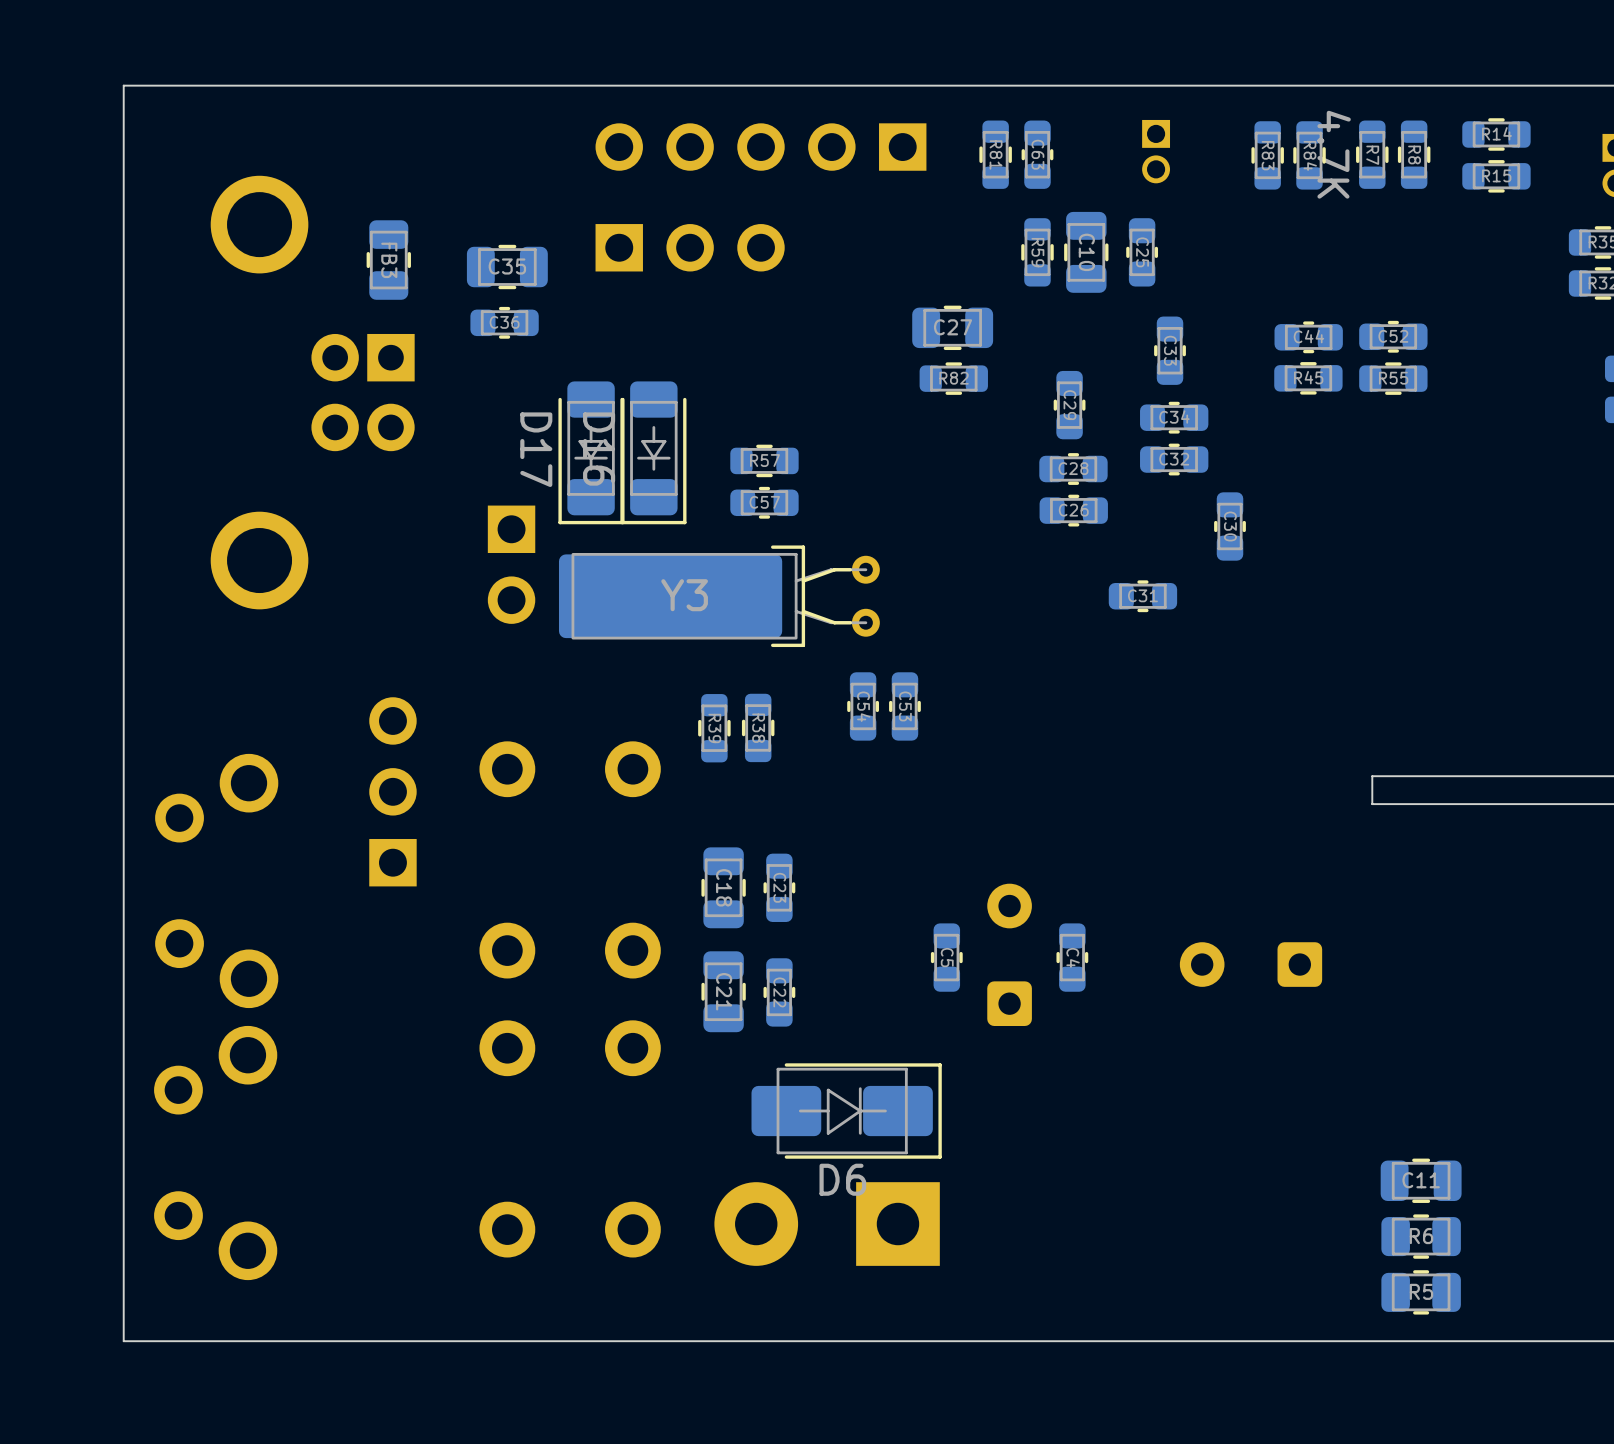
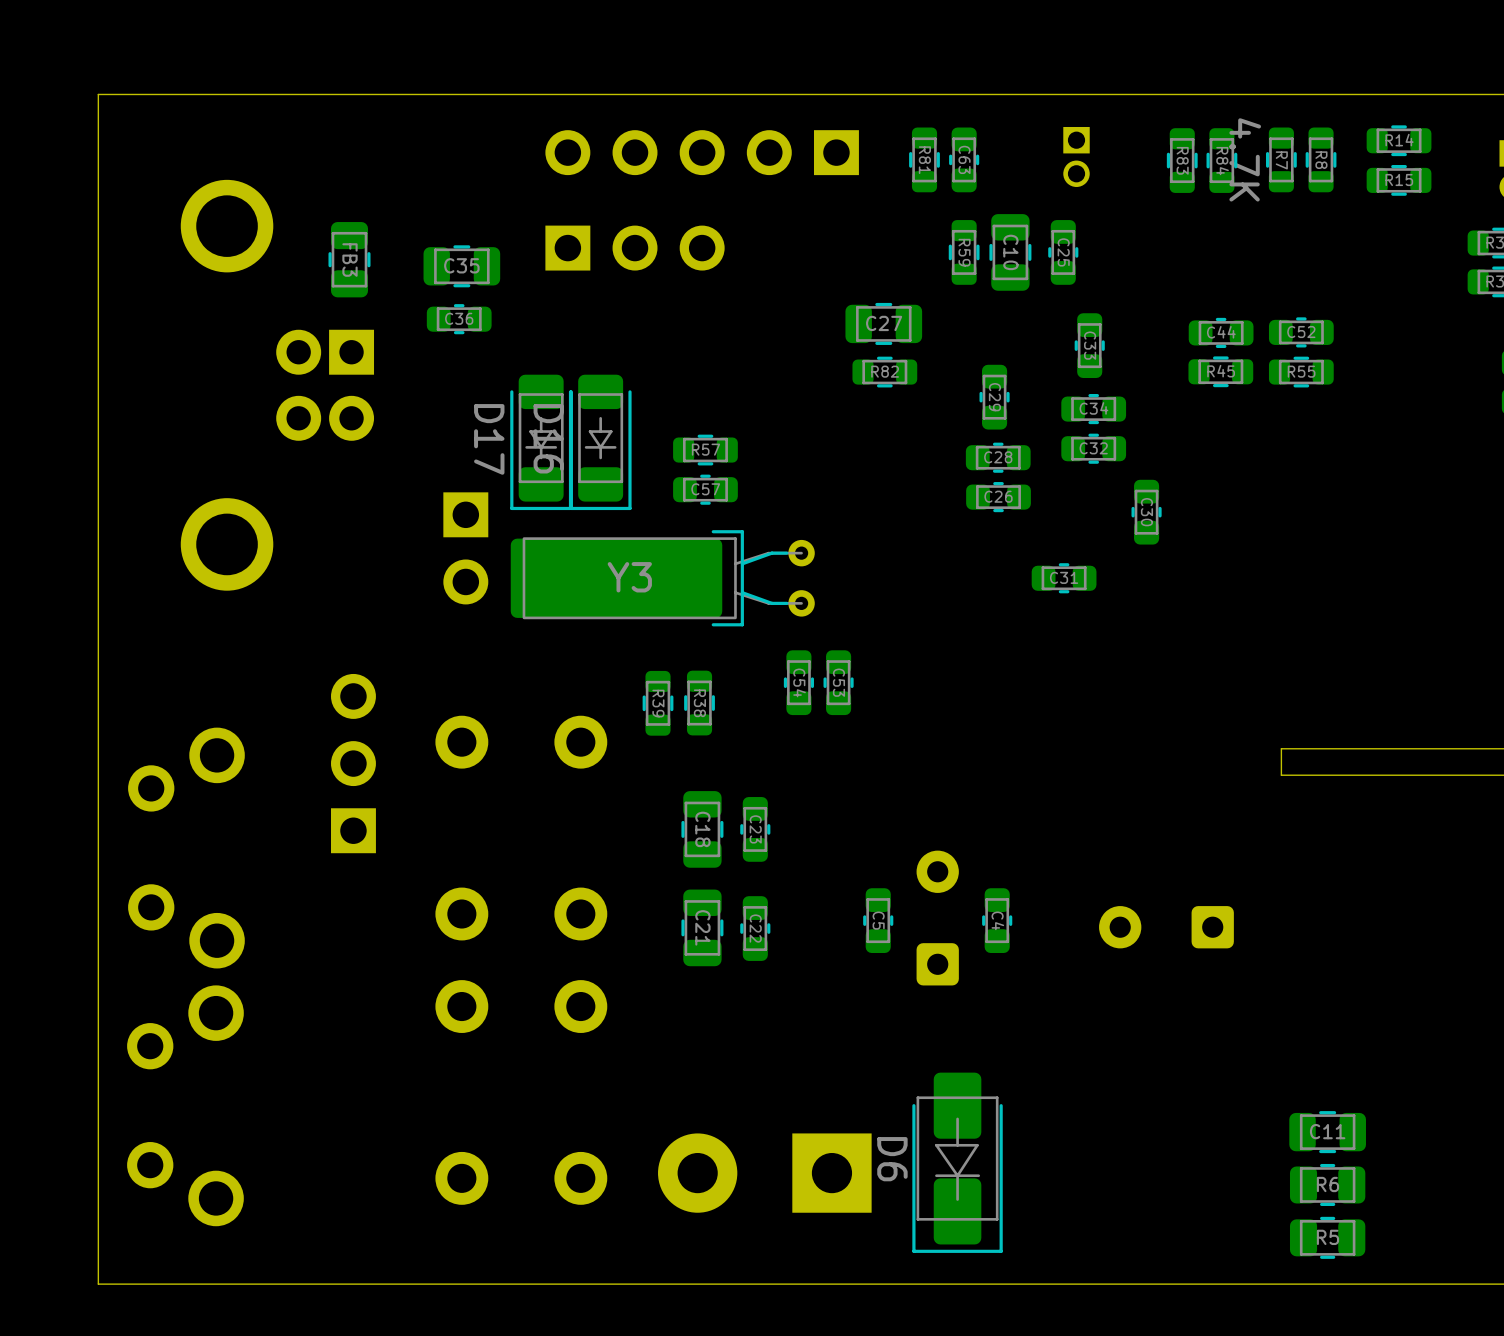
C18 position: (723, 887) -> (702, 829)
C23 position: (779, 887) -> (755, 829)
C21 position: (723, 991) -> (702, 927)
C22 position: (779, 992) -> (755, 928)
D6 rotation: 0° (846, 1111) -> 90° clockwise (957, 1162)
D6 position: (846, 1111) -> (957, 1162)

